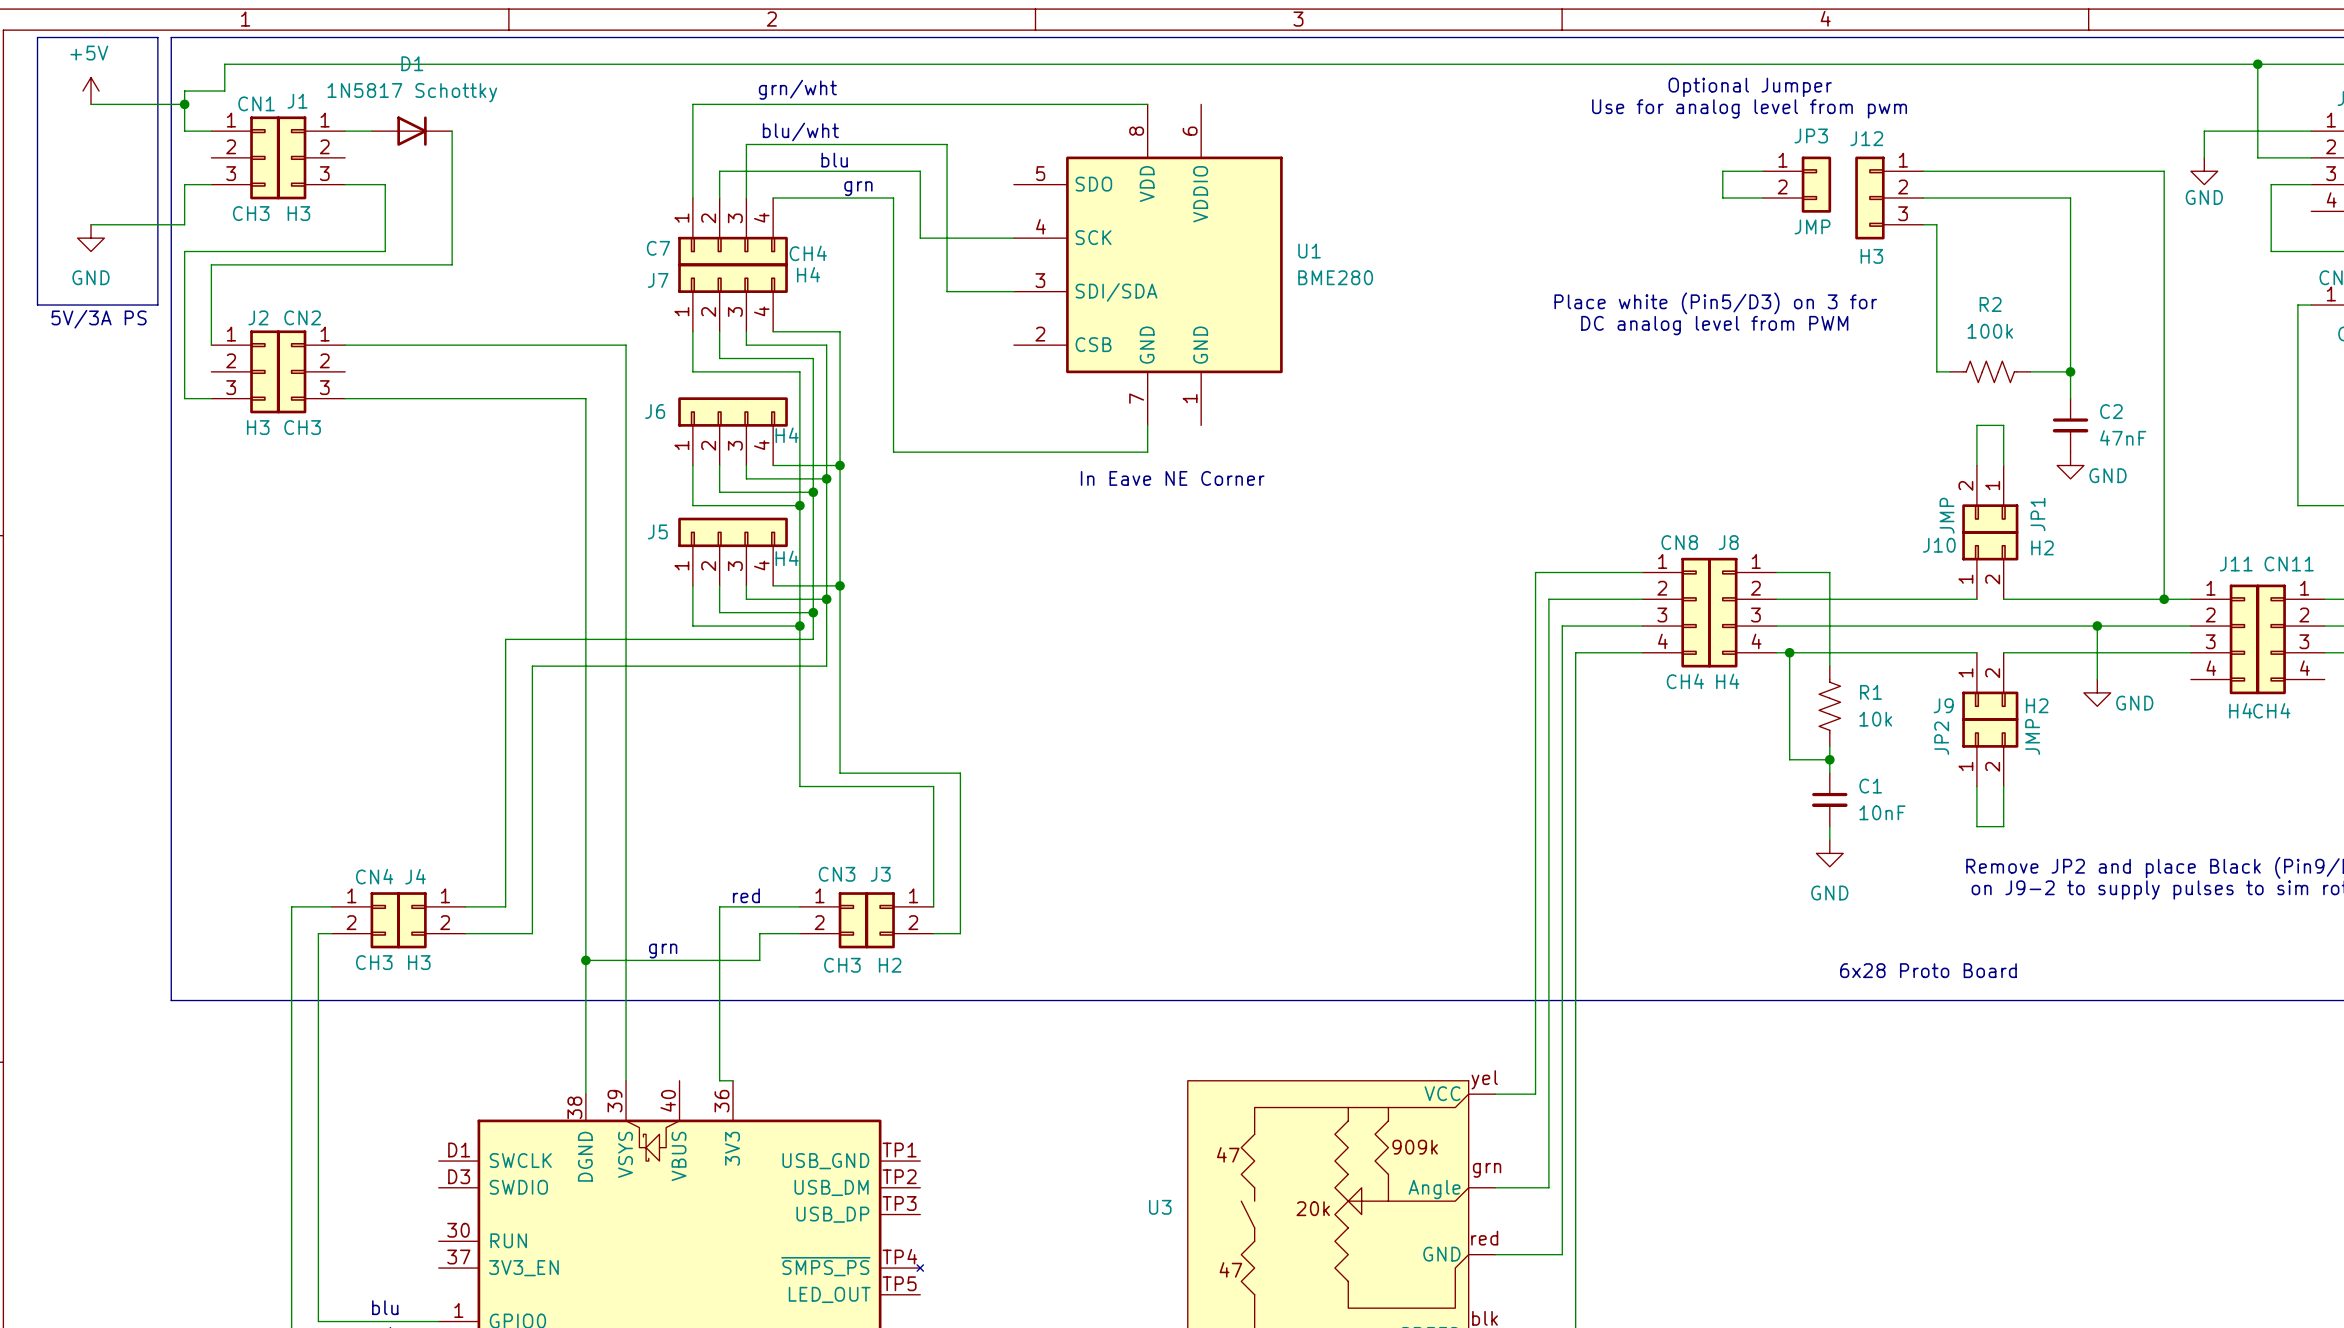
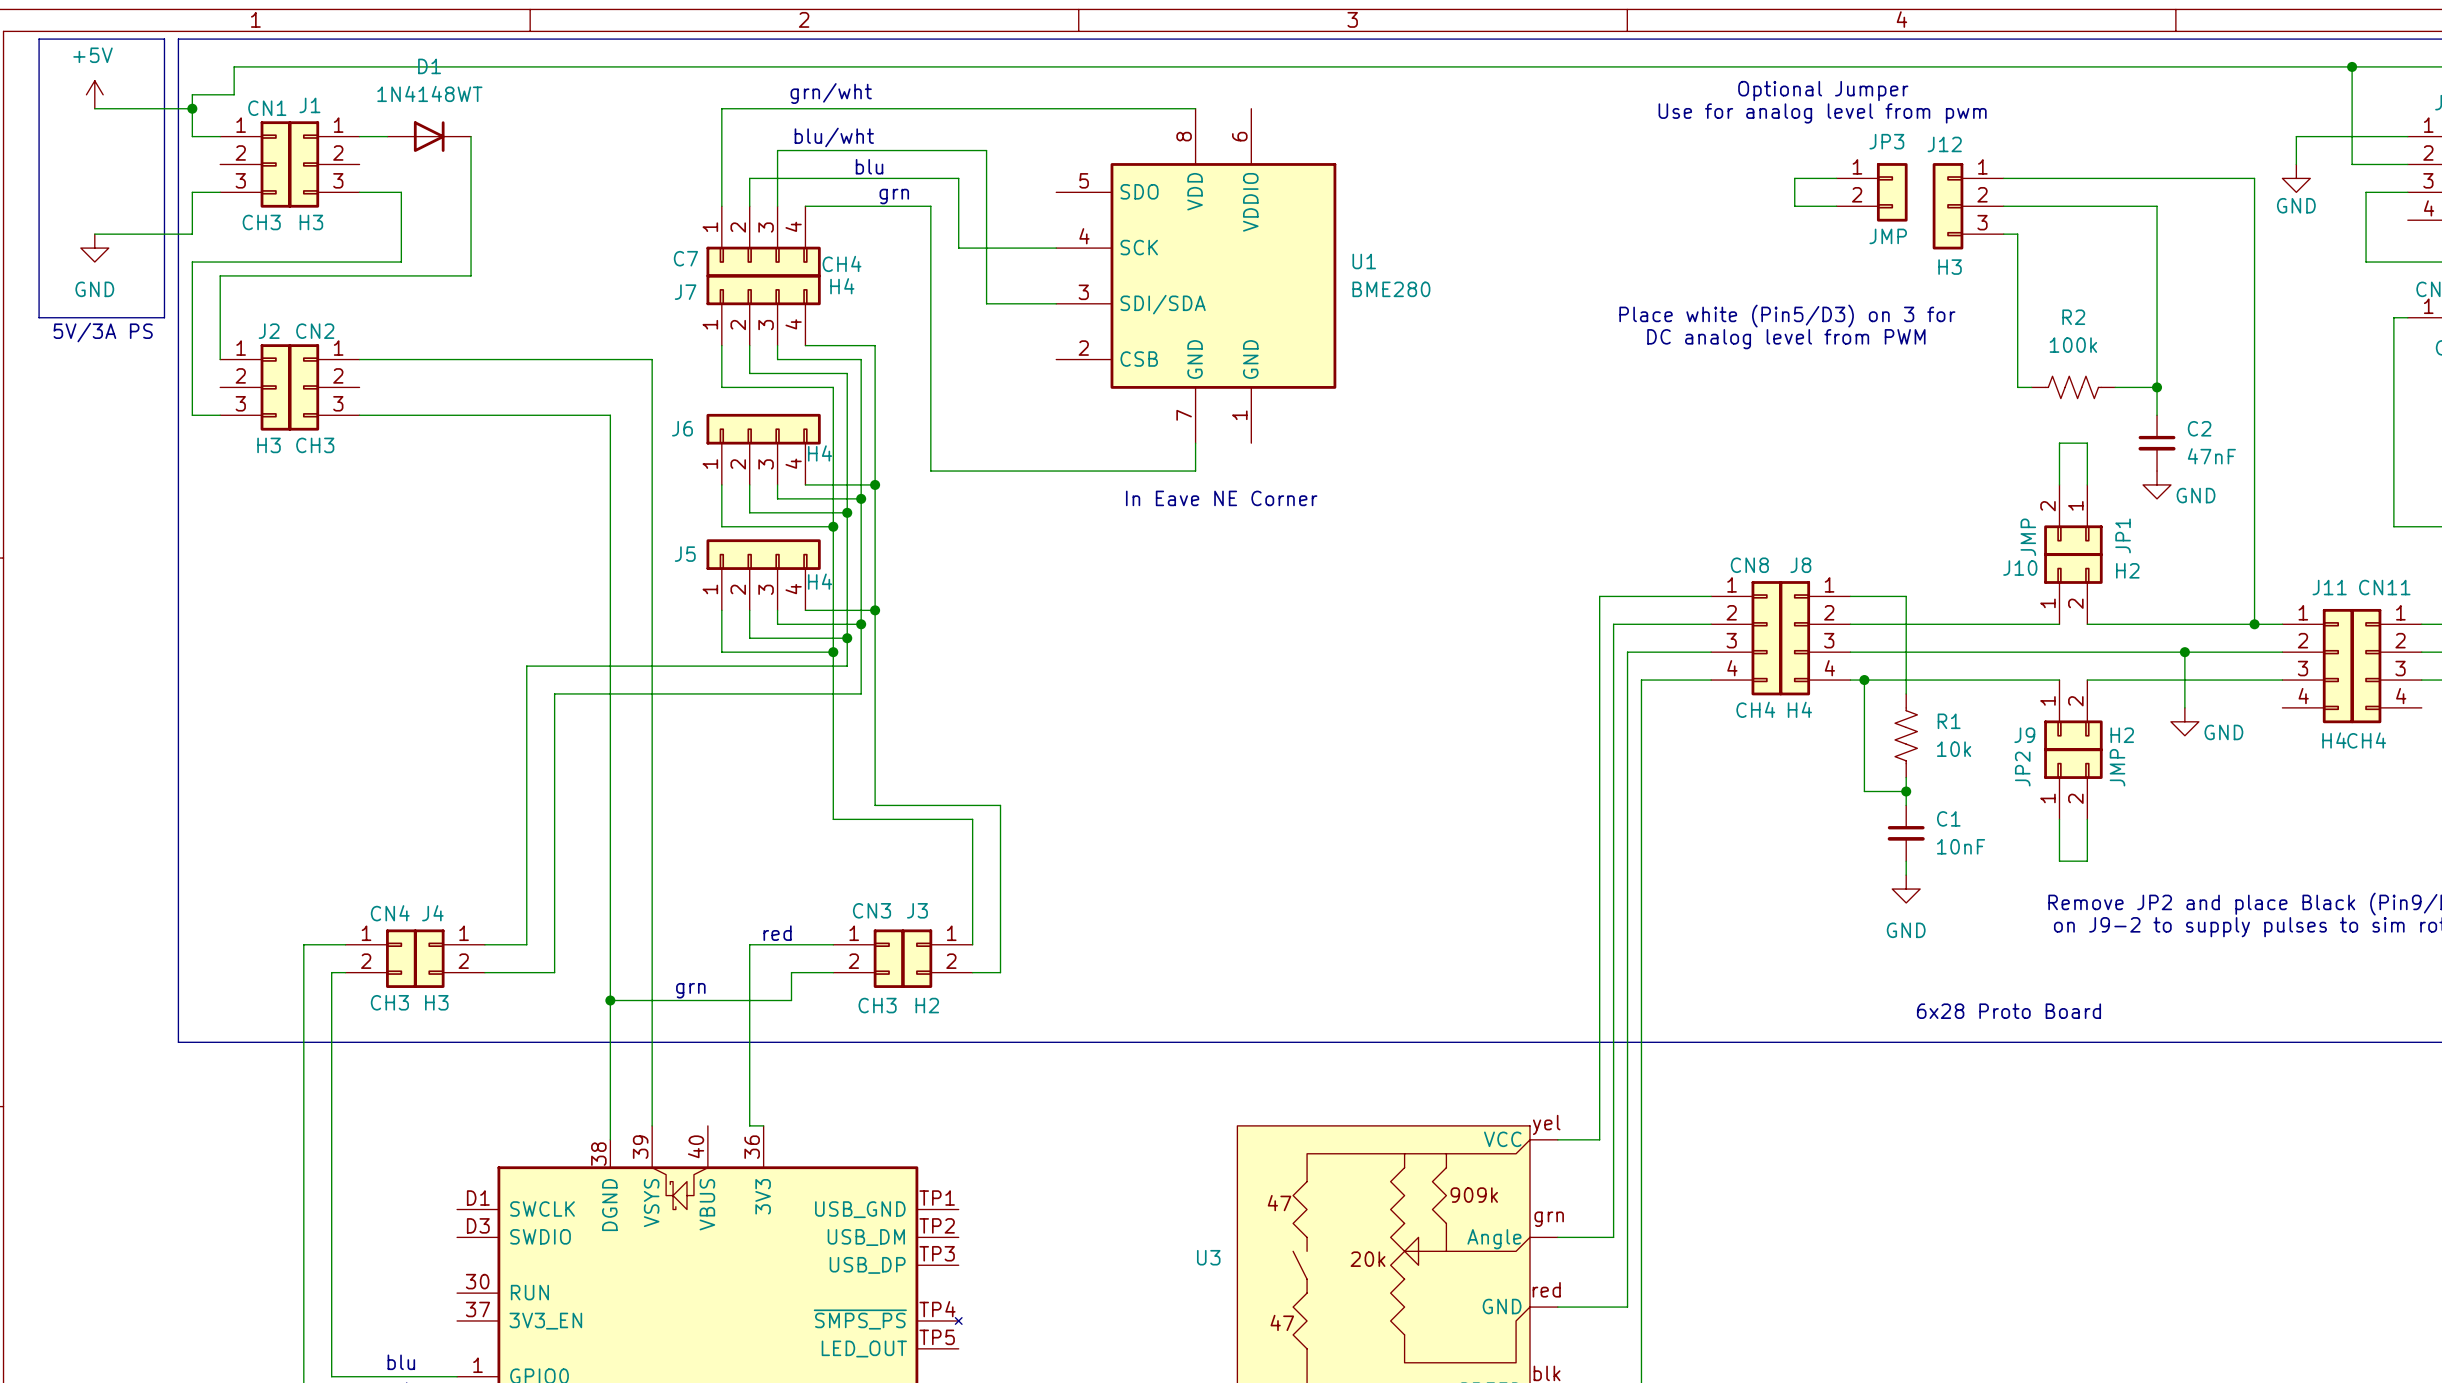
D1 value: 1N5817 Schottky (412, 92) -> 1N4148WT (429, 93)

